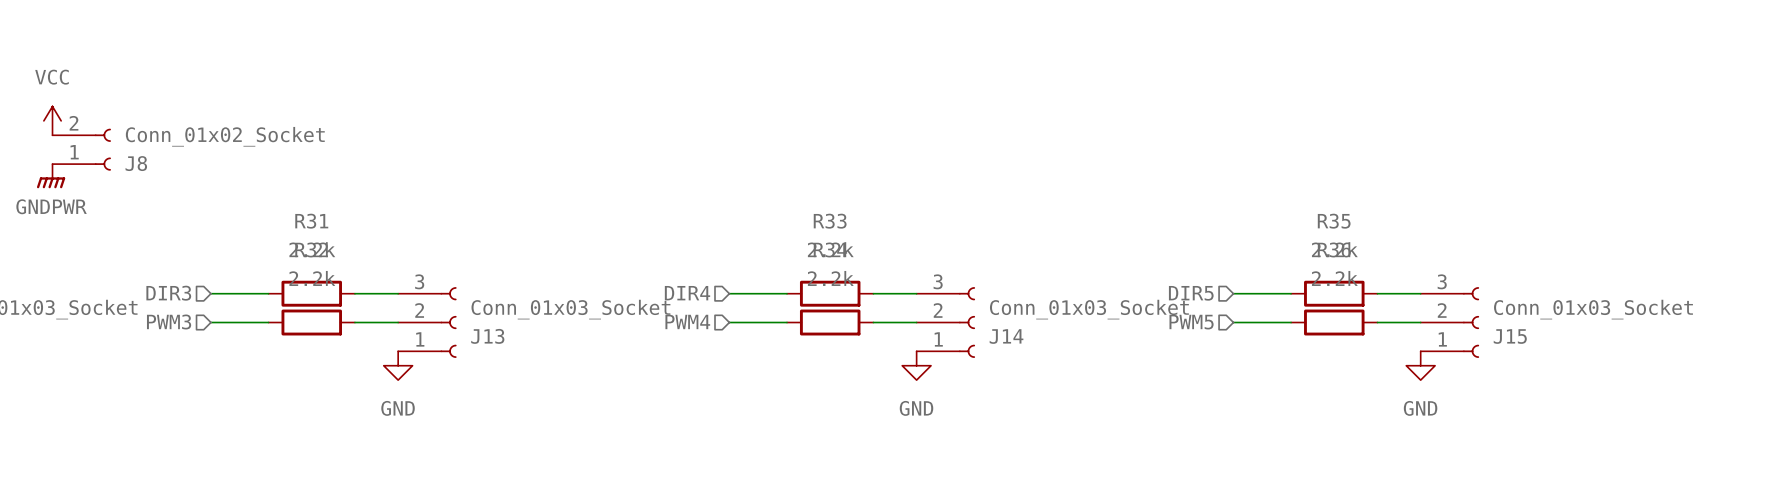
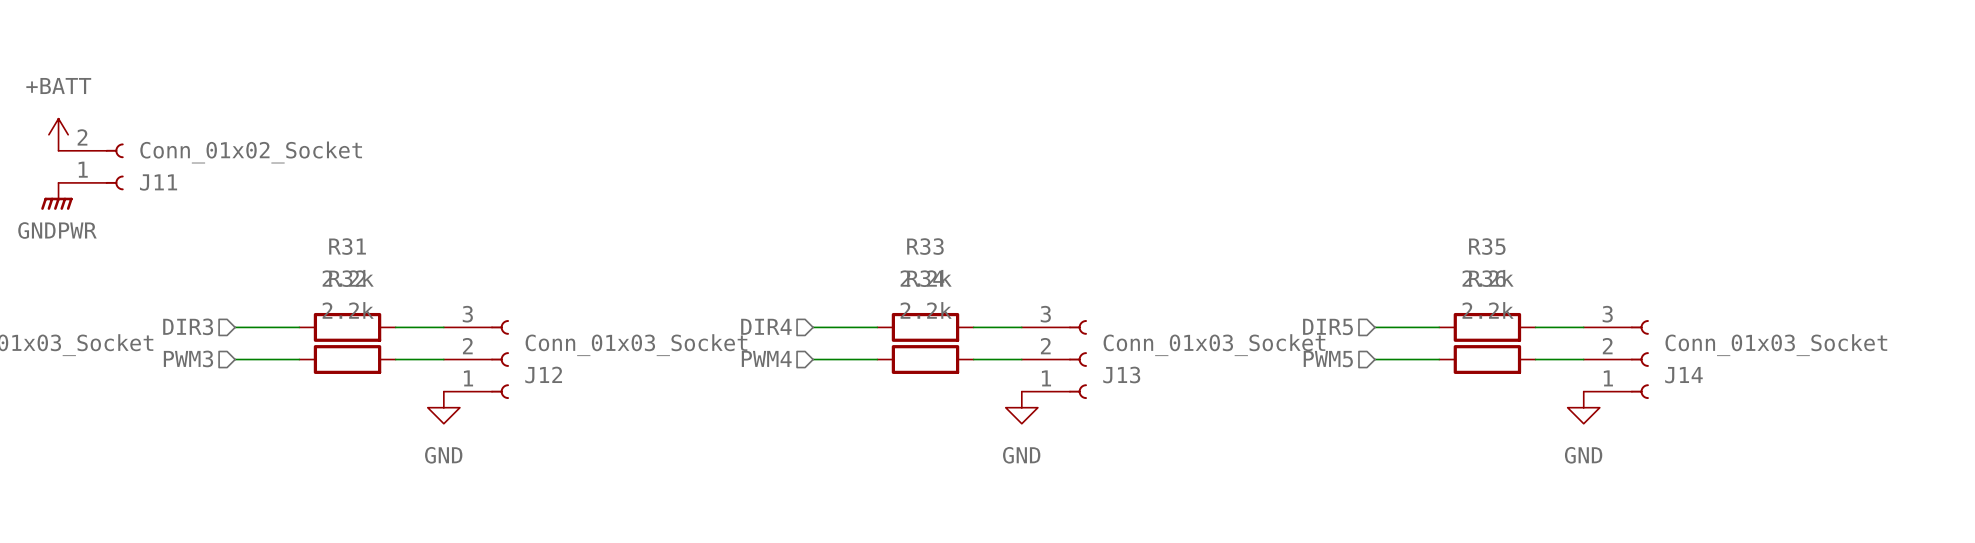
power symbol: VCC (52, 120) -> +BATT (58, 134)
J8 name: J8 (136, 163) -> J11 (158, 182)
J13 name: J13 (487, 336) -> J12 (543, 374)
J14 name: J14 (1006, 336) -> J13 (1121, 374)
J15 name: J15 (1510, 336) -> J14 (1683, 375)

